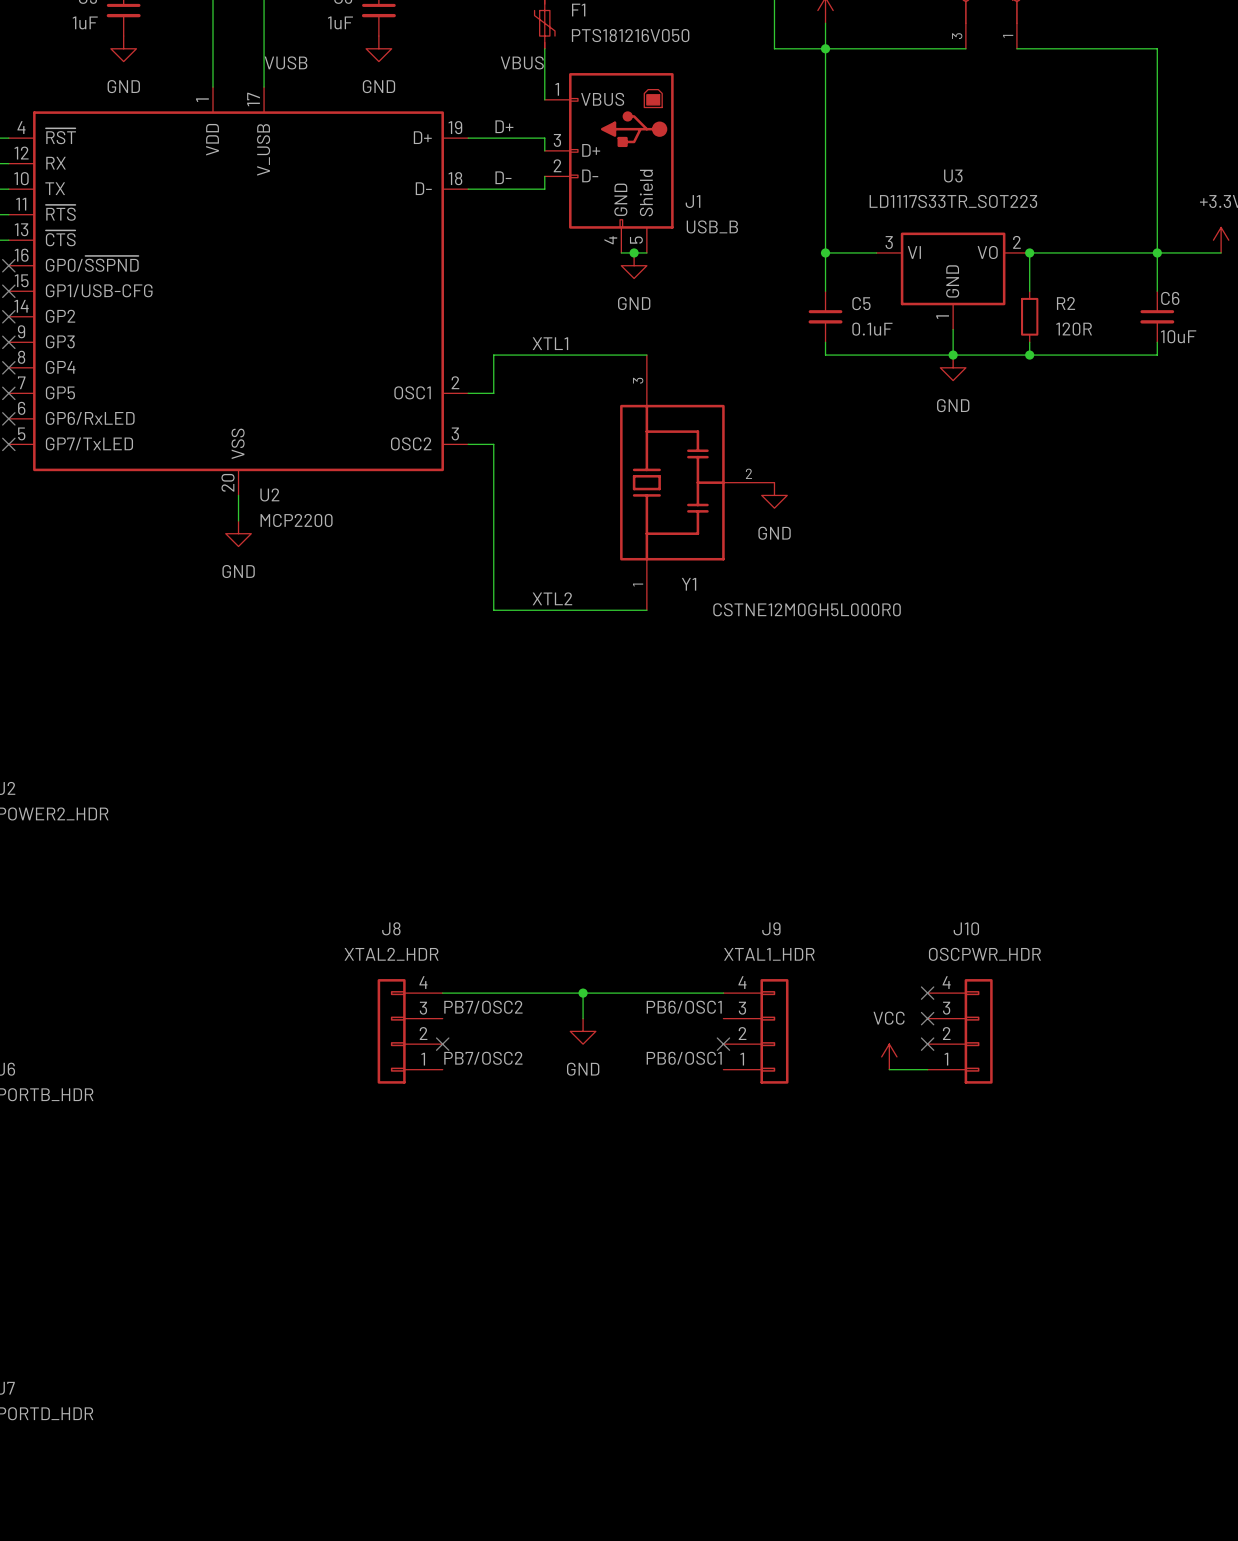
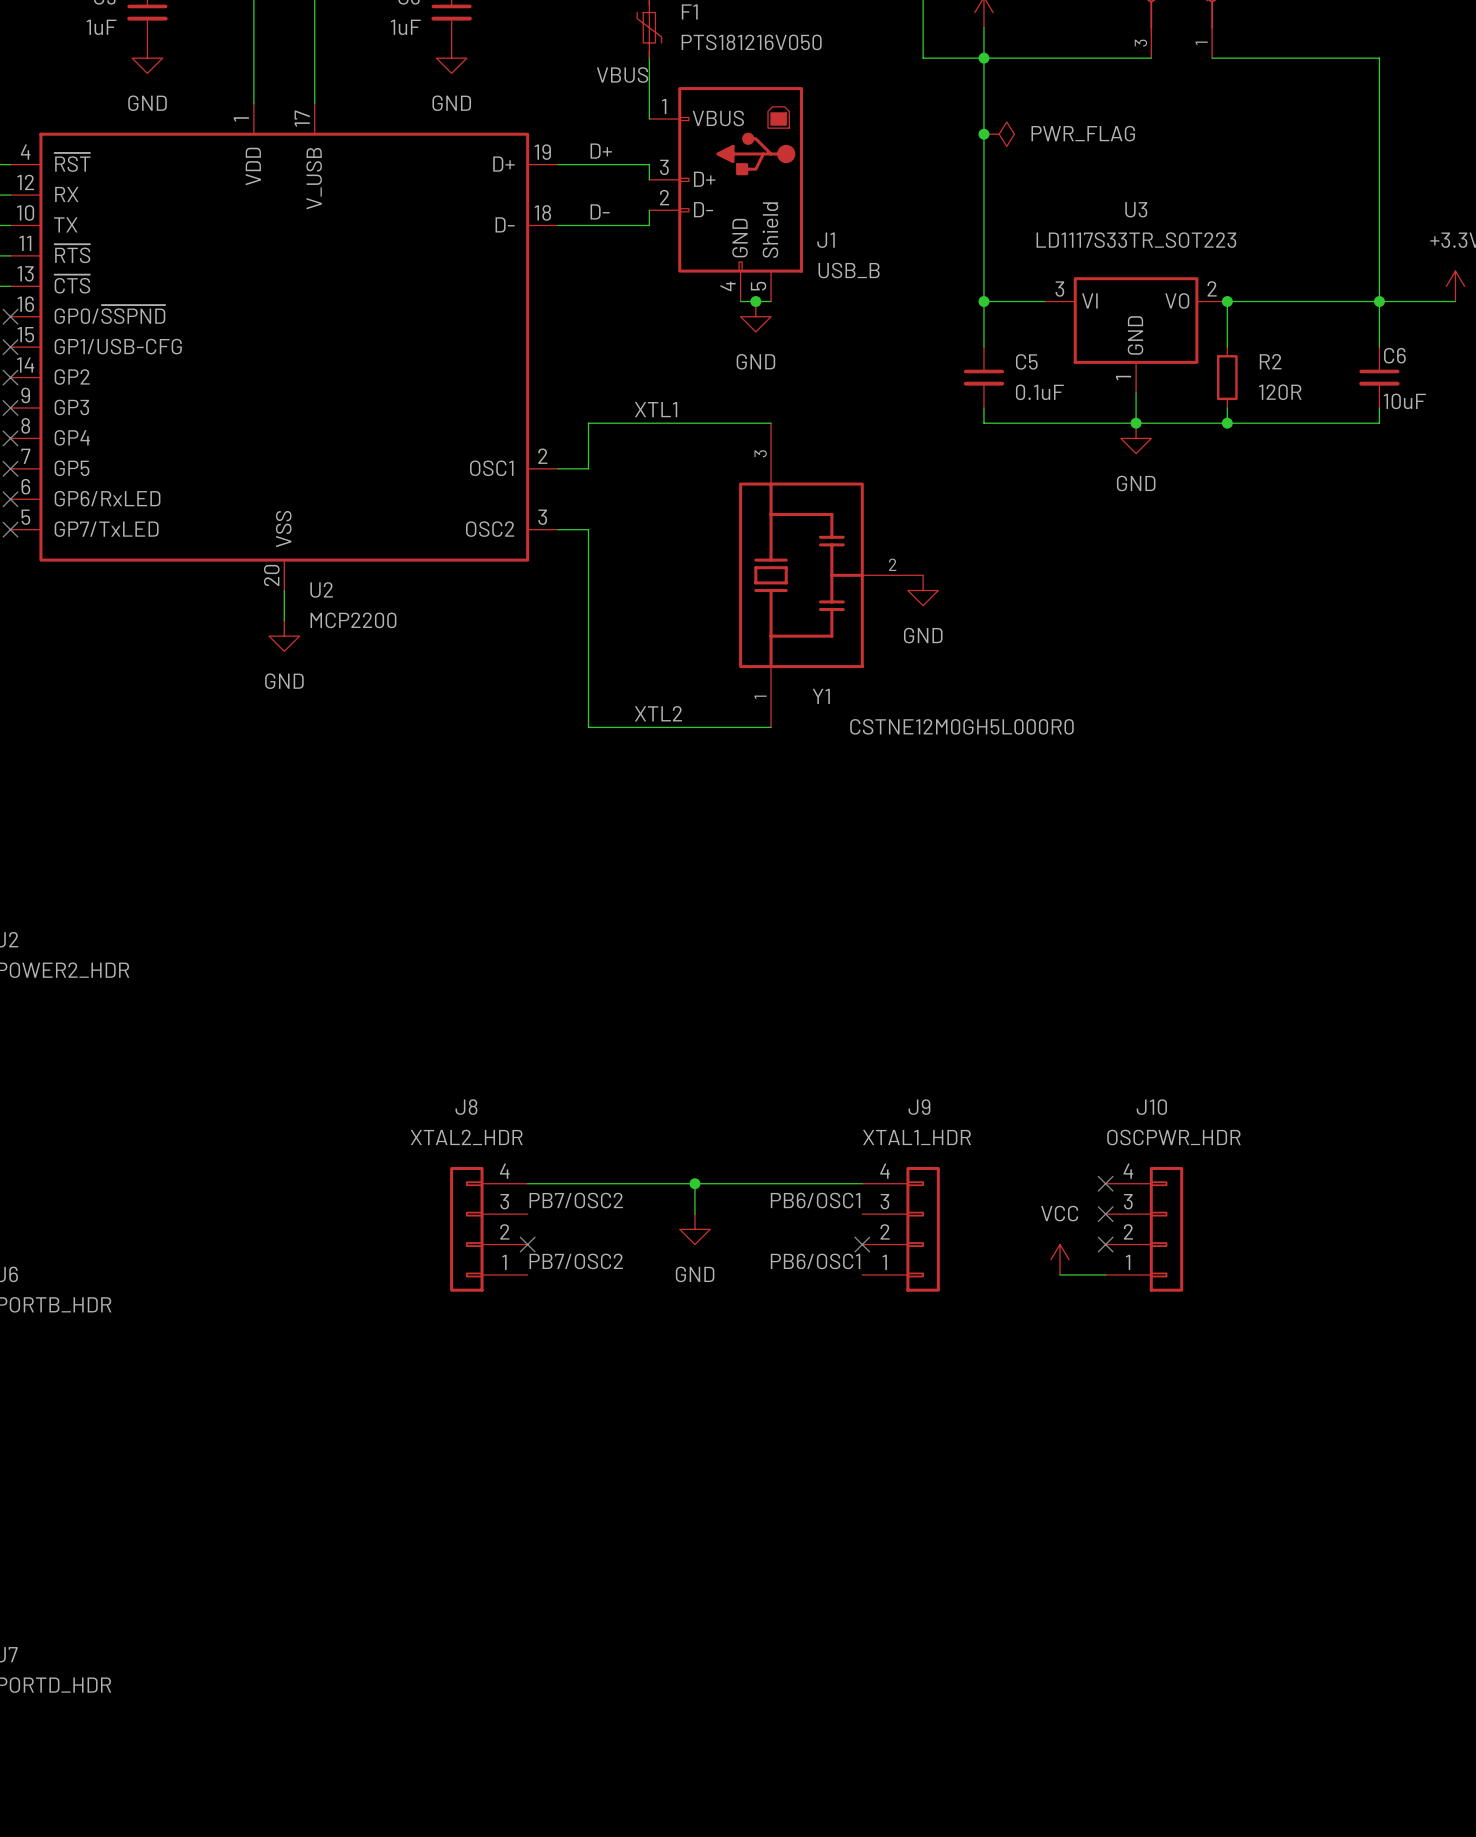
label: VUSB (286, 62) -> none
junction: none -> (983, 134)
power symbol: none -> PWR_FLAG (999, 134)

